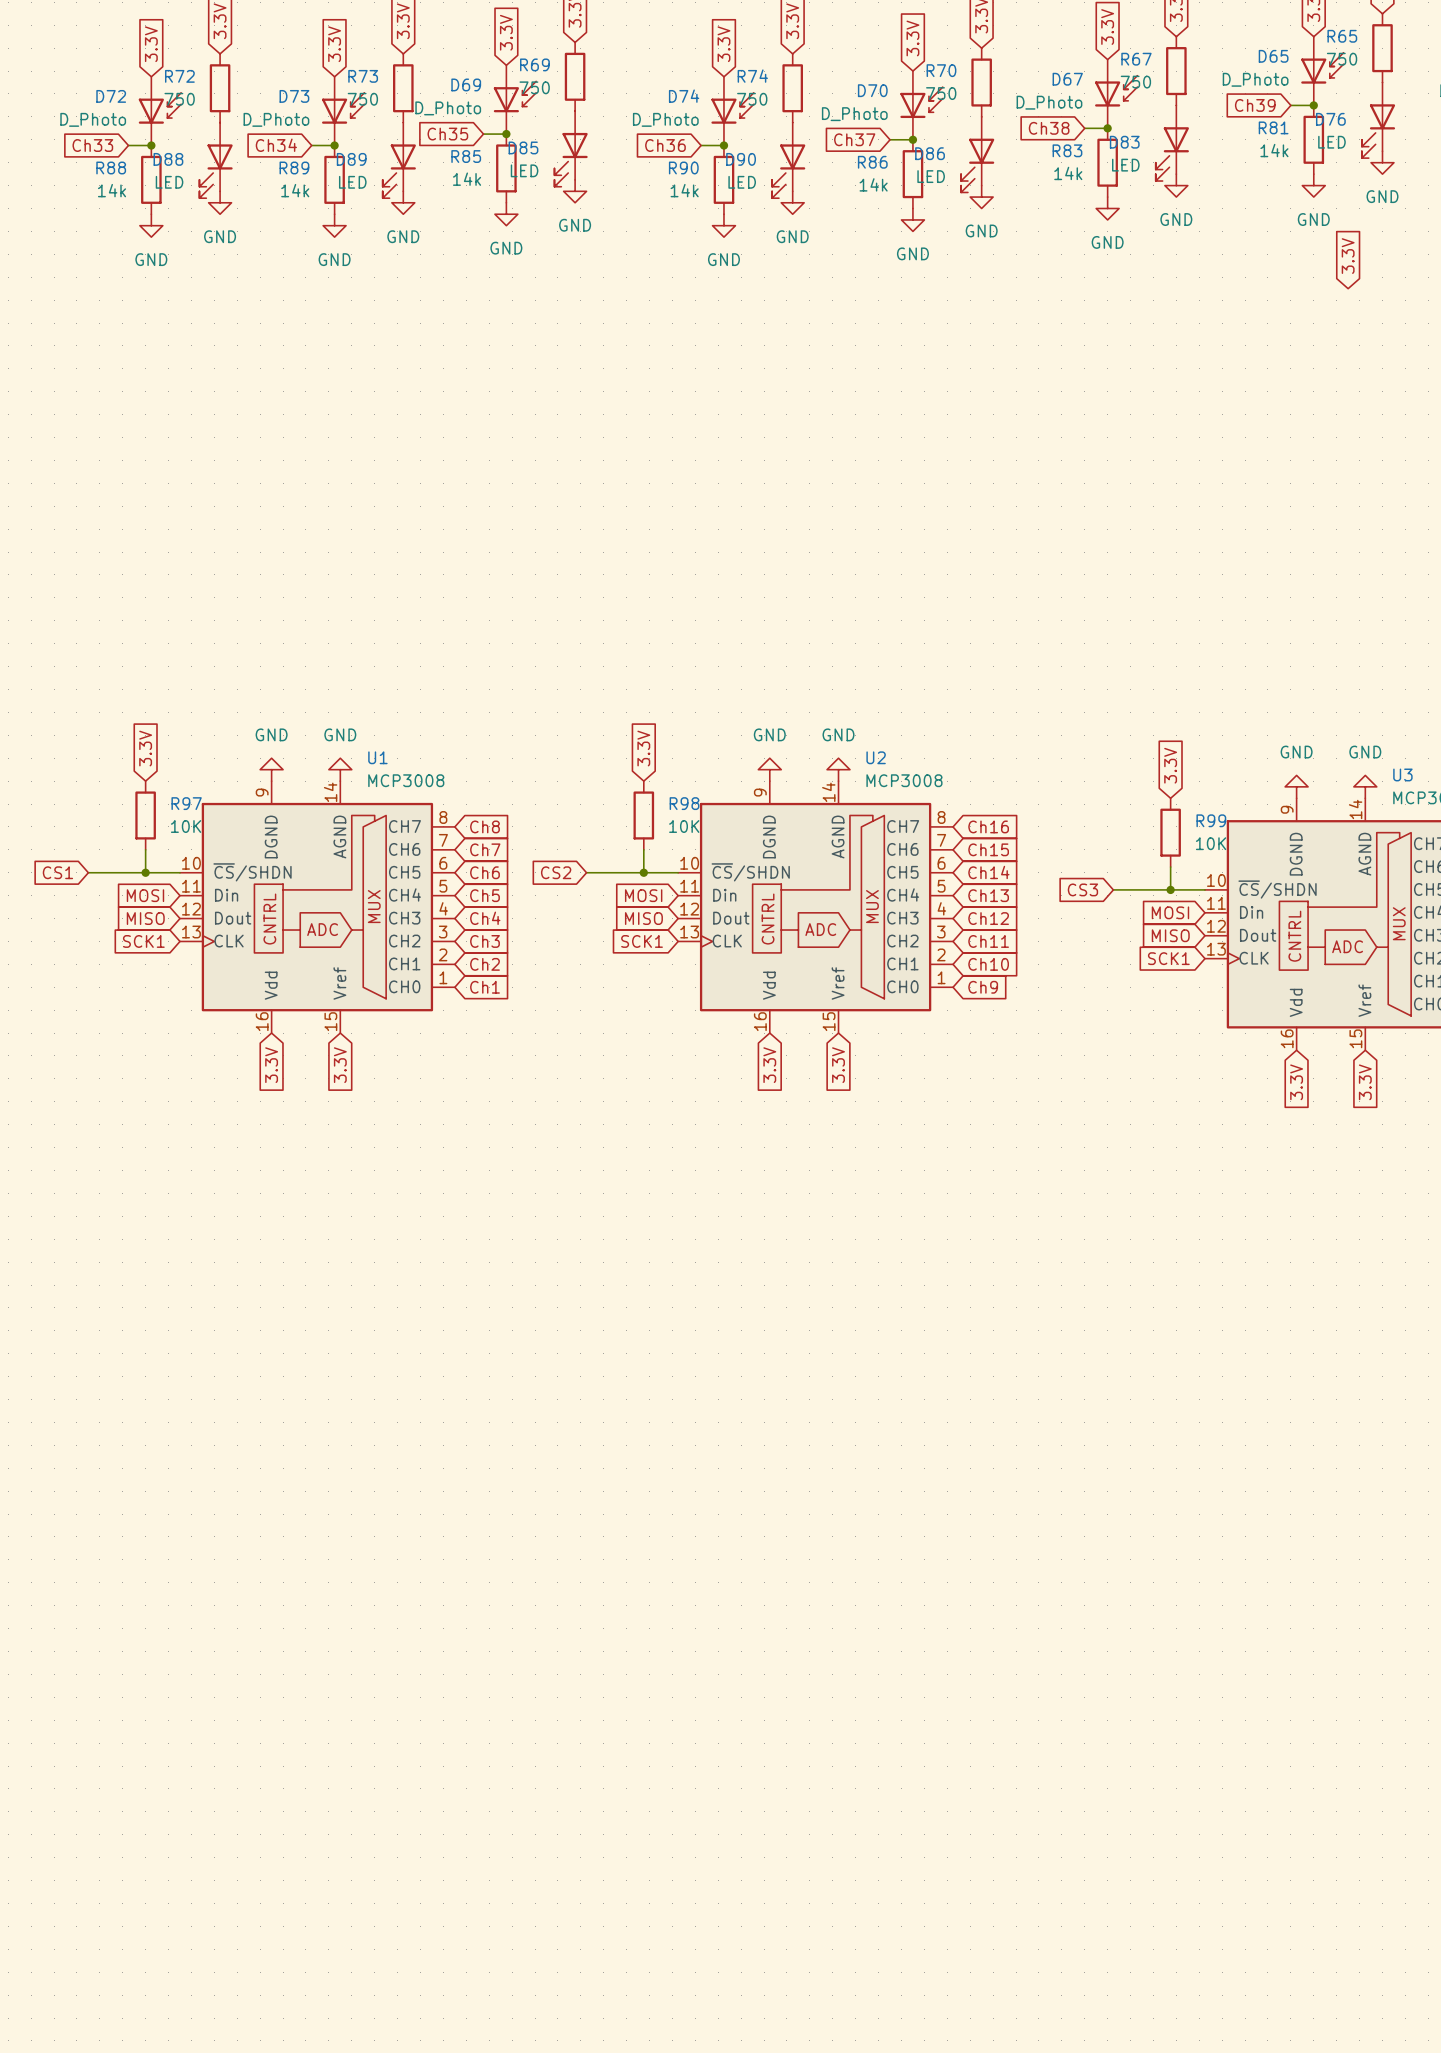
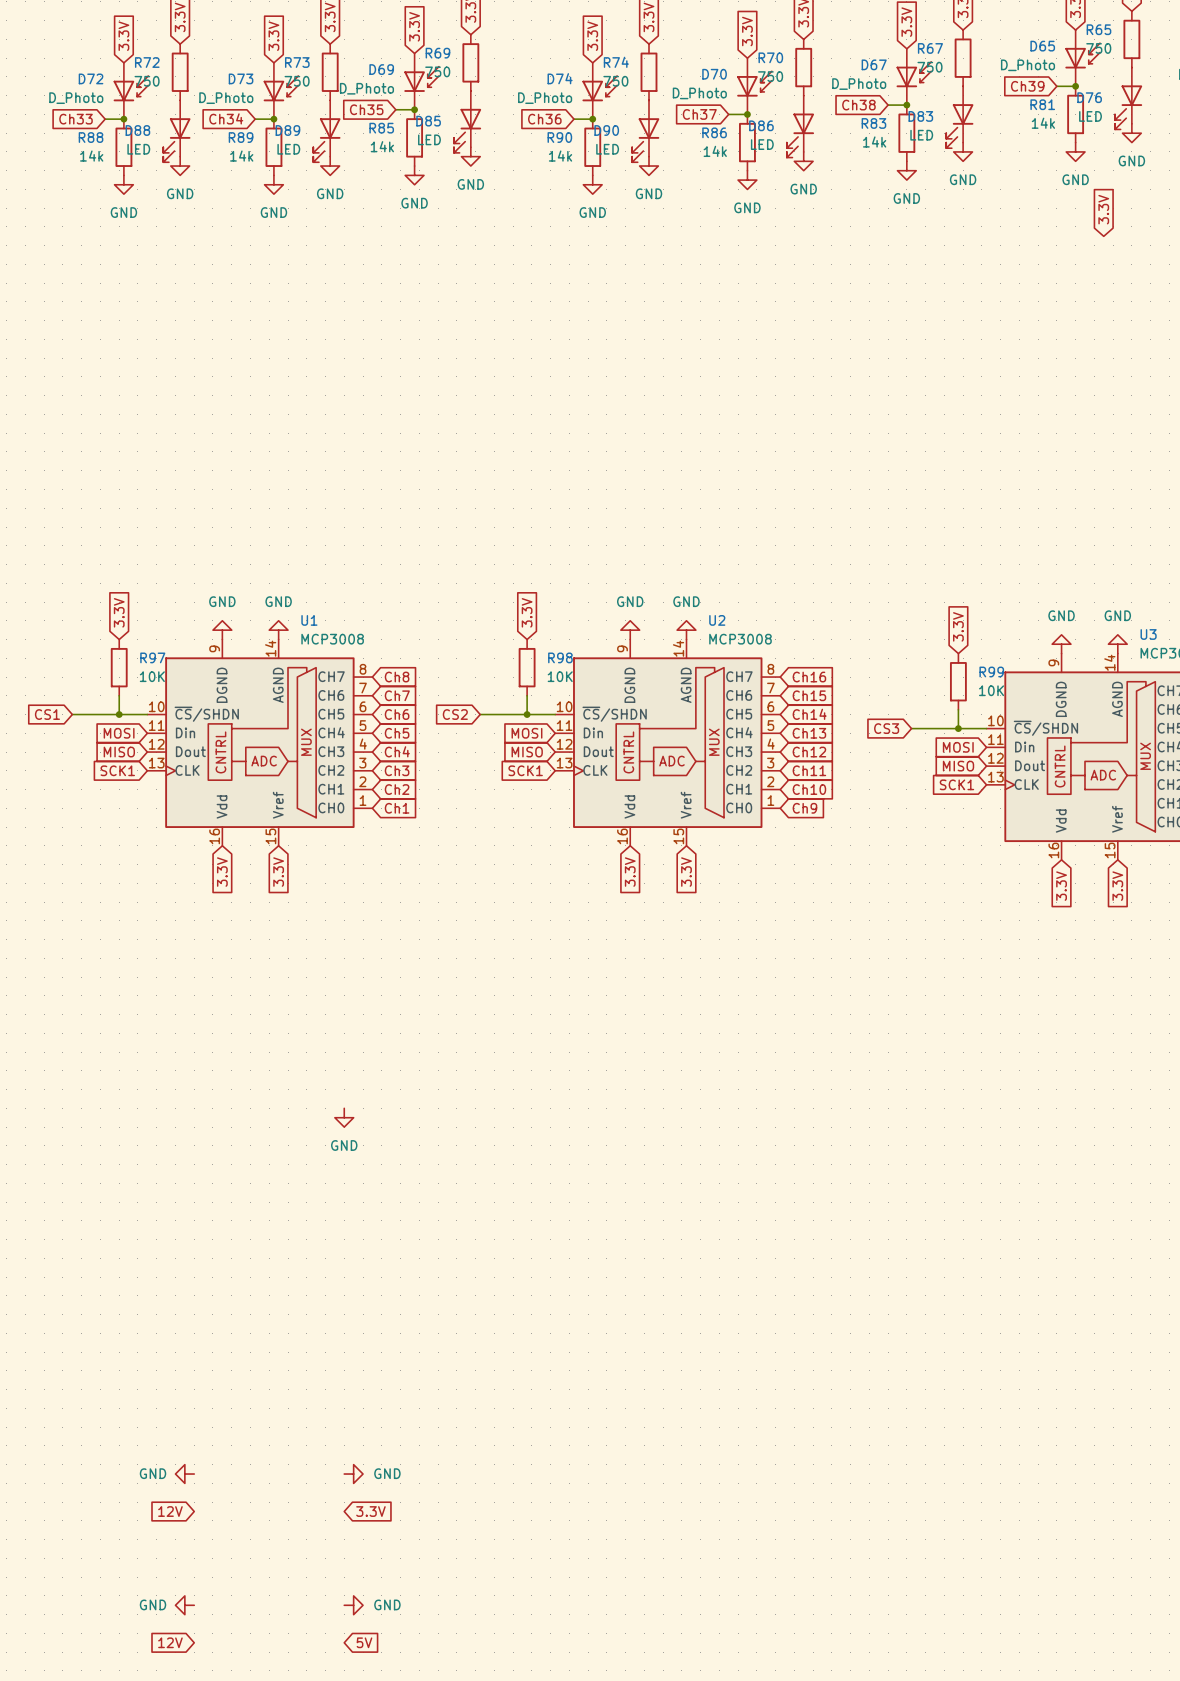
power symbol: none -> GND (344, 1117)
power symbol: none -> GND (184, 1474)
power symbol: none -> GND (353, 1474)
global label: none -> 12V (170, 1511)
global label: none -> 3.3V (370, 1511)
power symbol: none -> GND (184, 1605)
power symbol: none -> GND (353, 1605)
global label: none -> 12V (170, 1642)
global label: none -> 5V (364, 1642)

